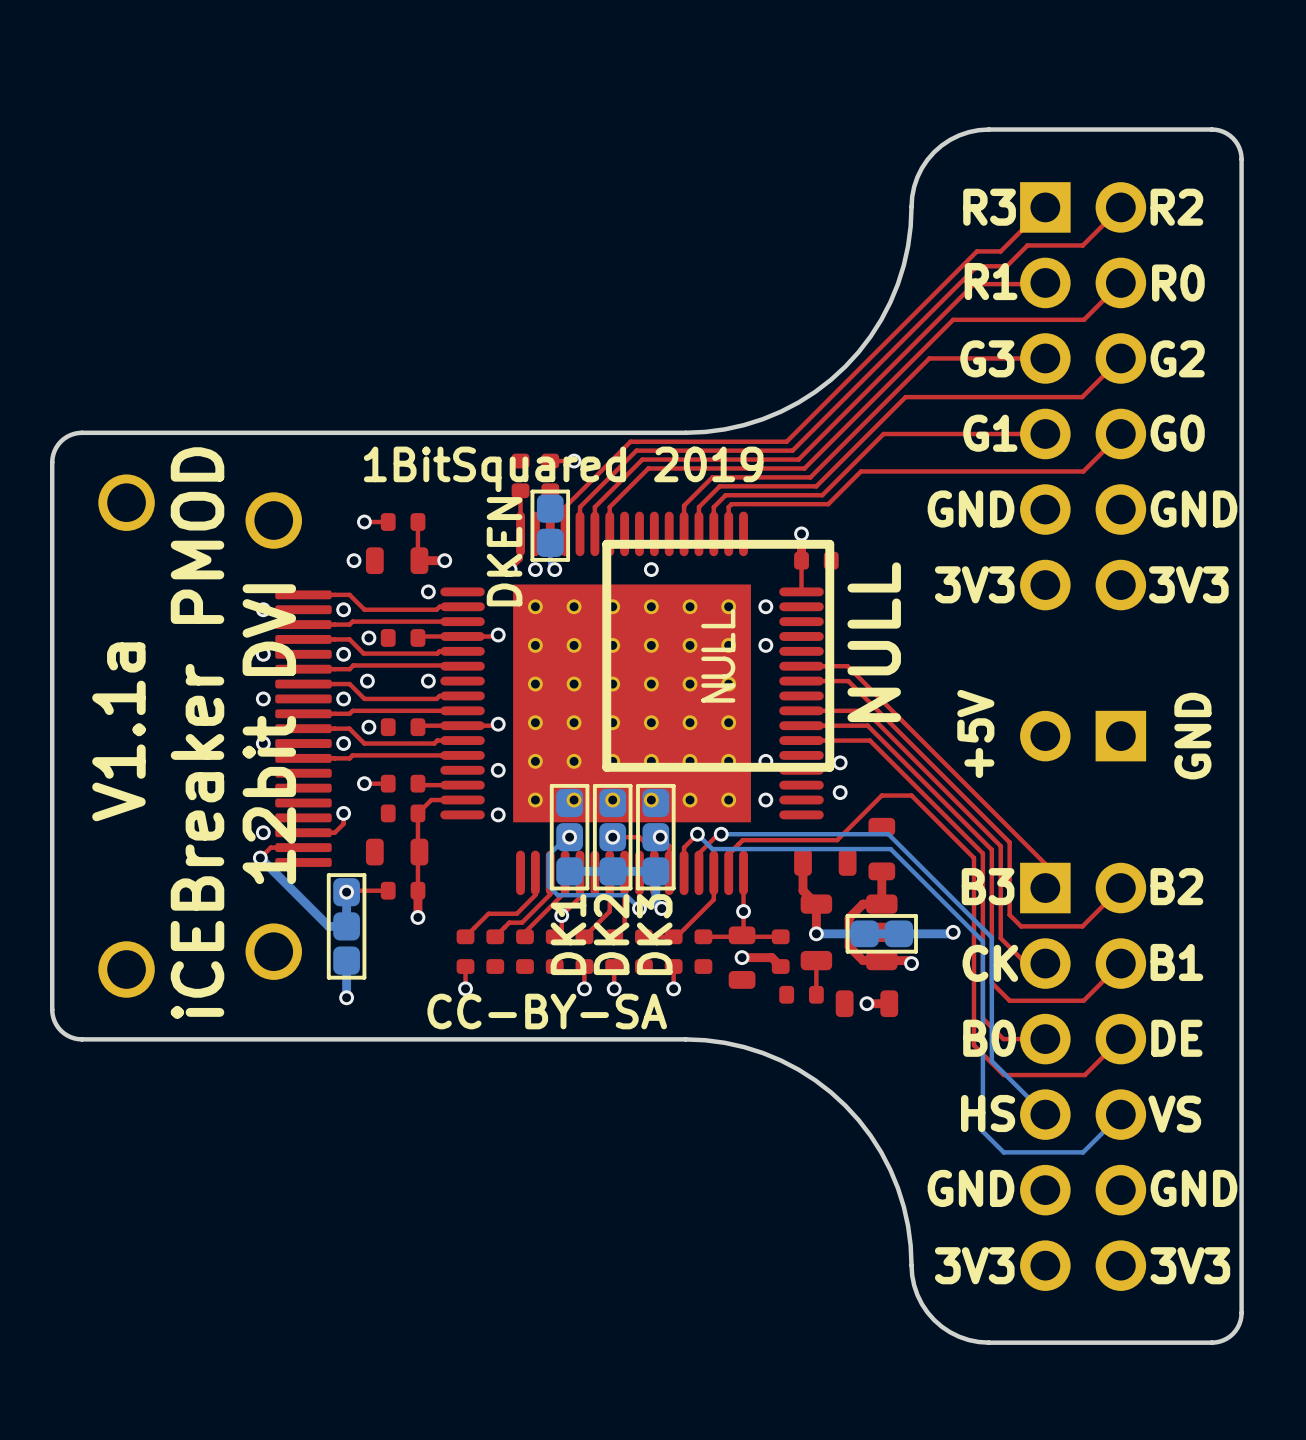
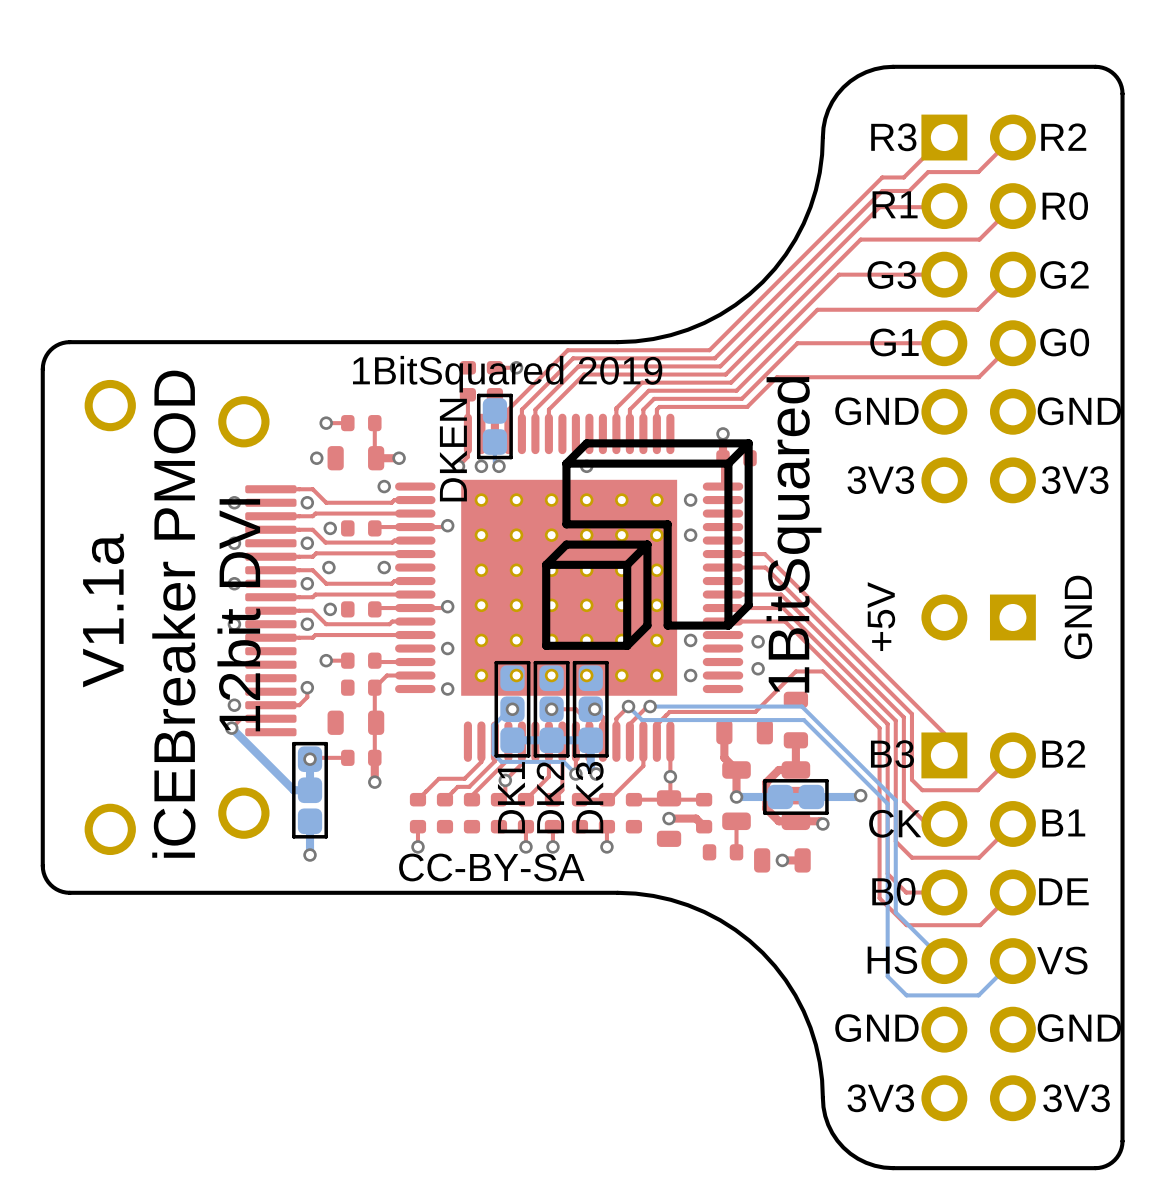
drawing shape: [602, 539, 835, 772] -> [542, 439, 753, 650]
text: NULL (874, 642) -> 1BitSquared (794, 534)

